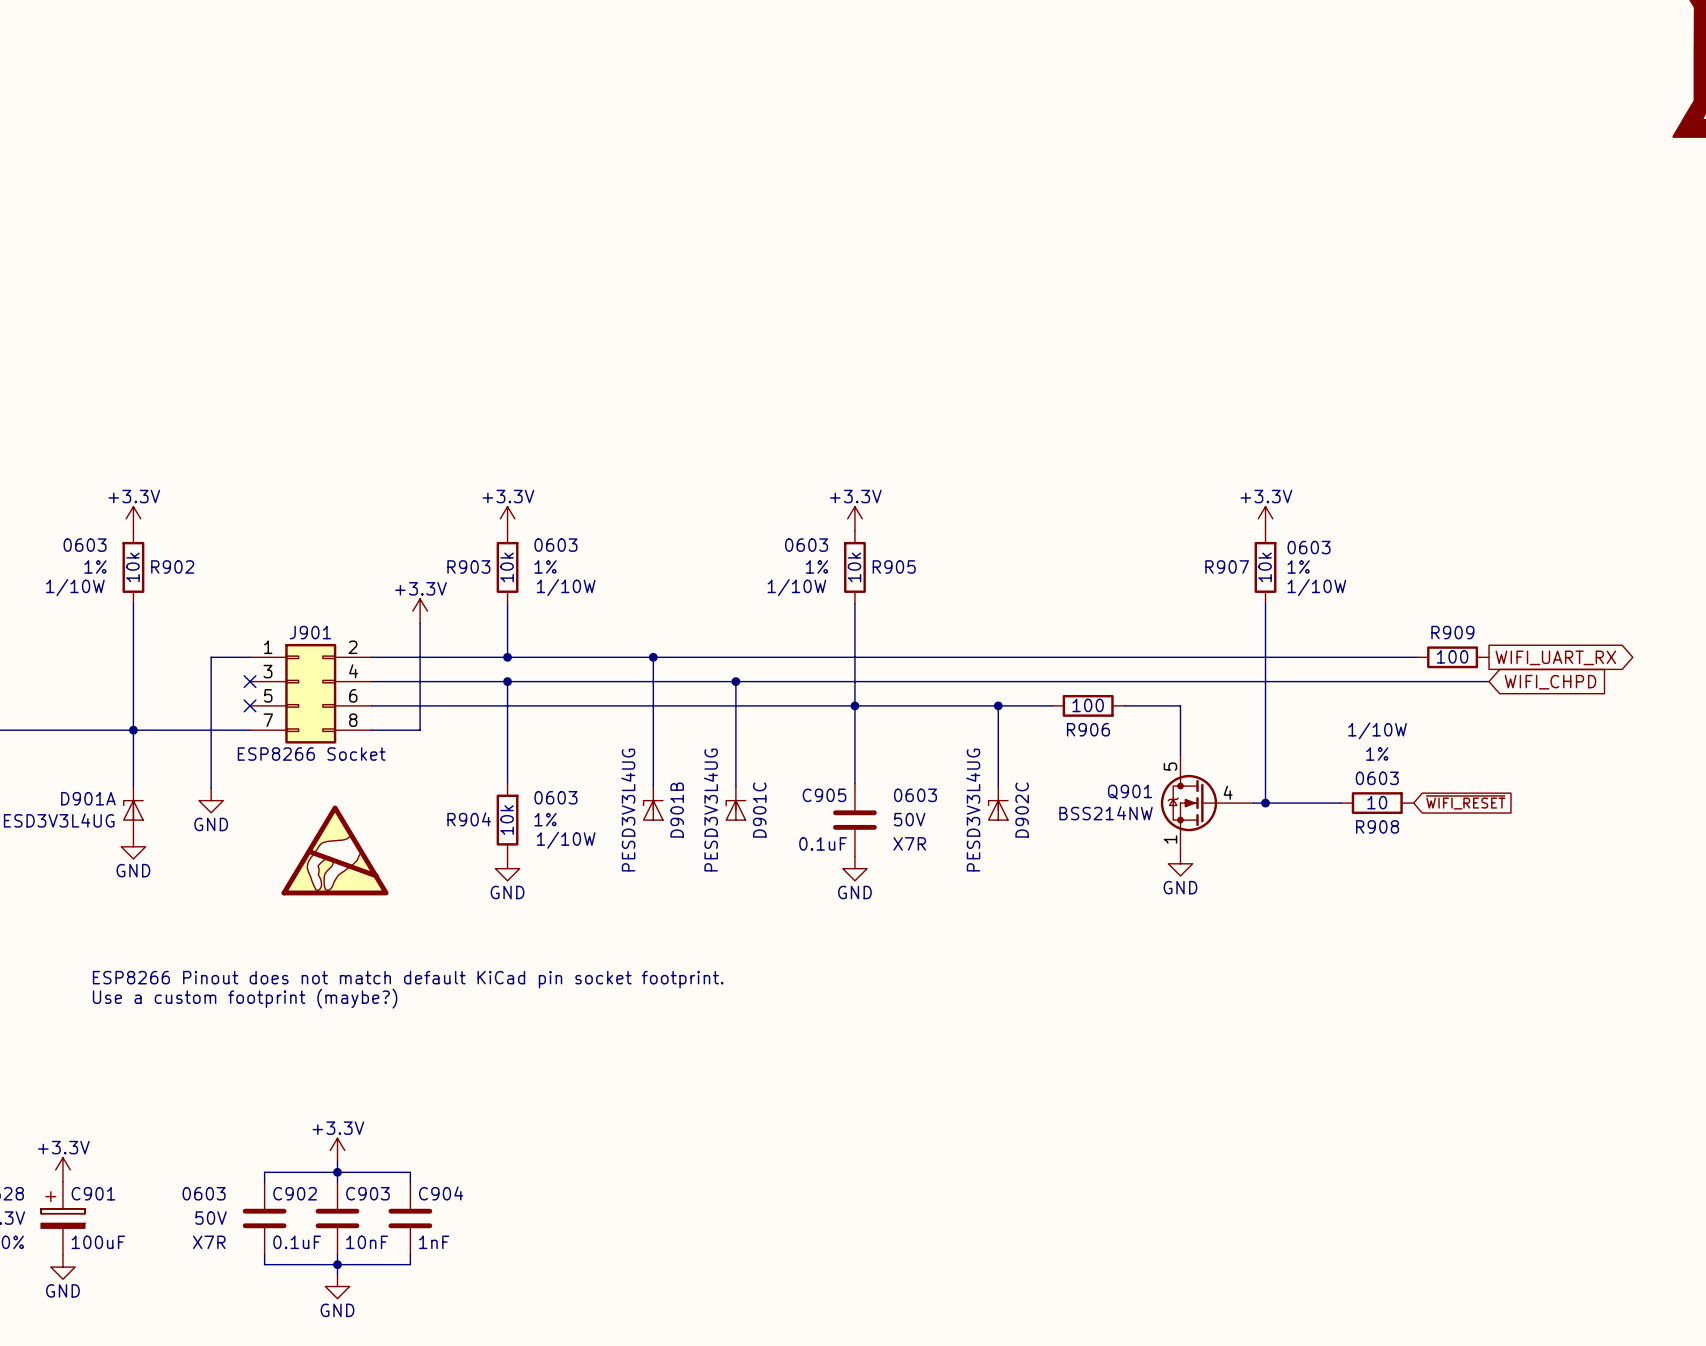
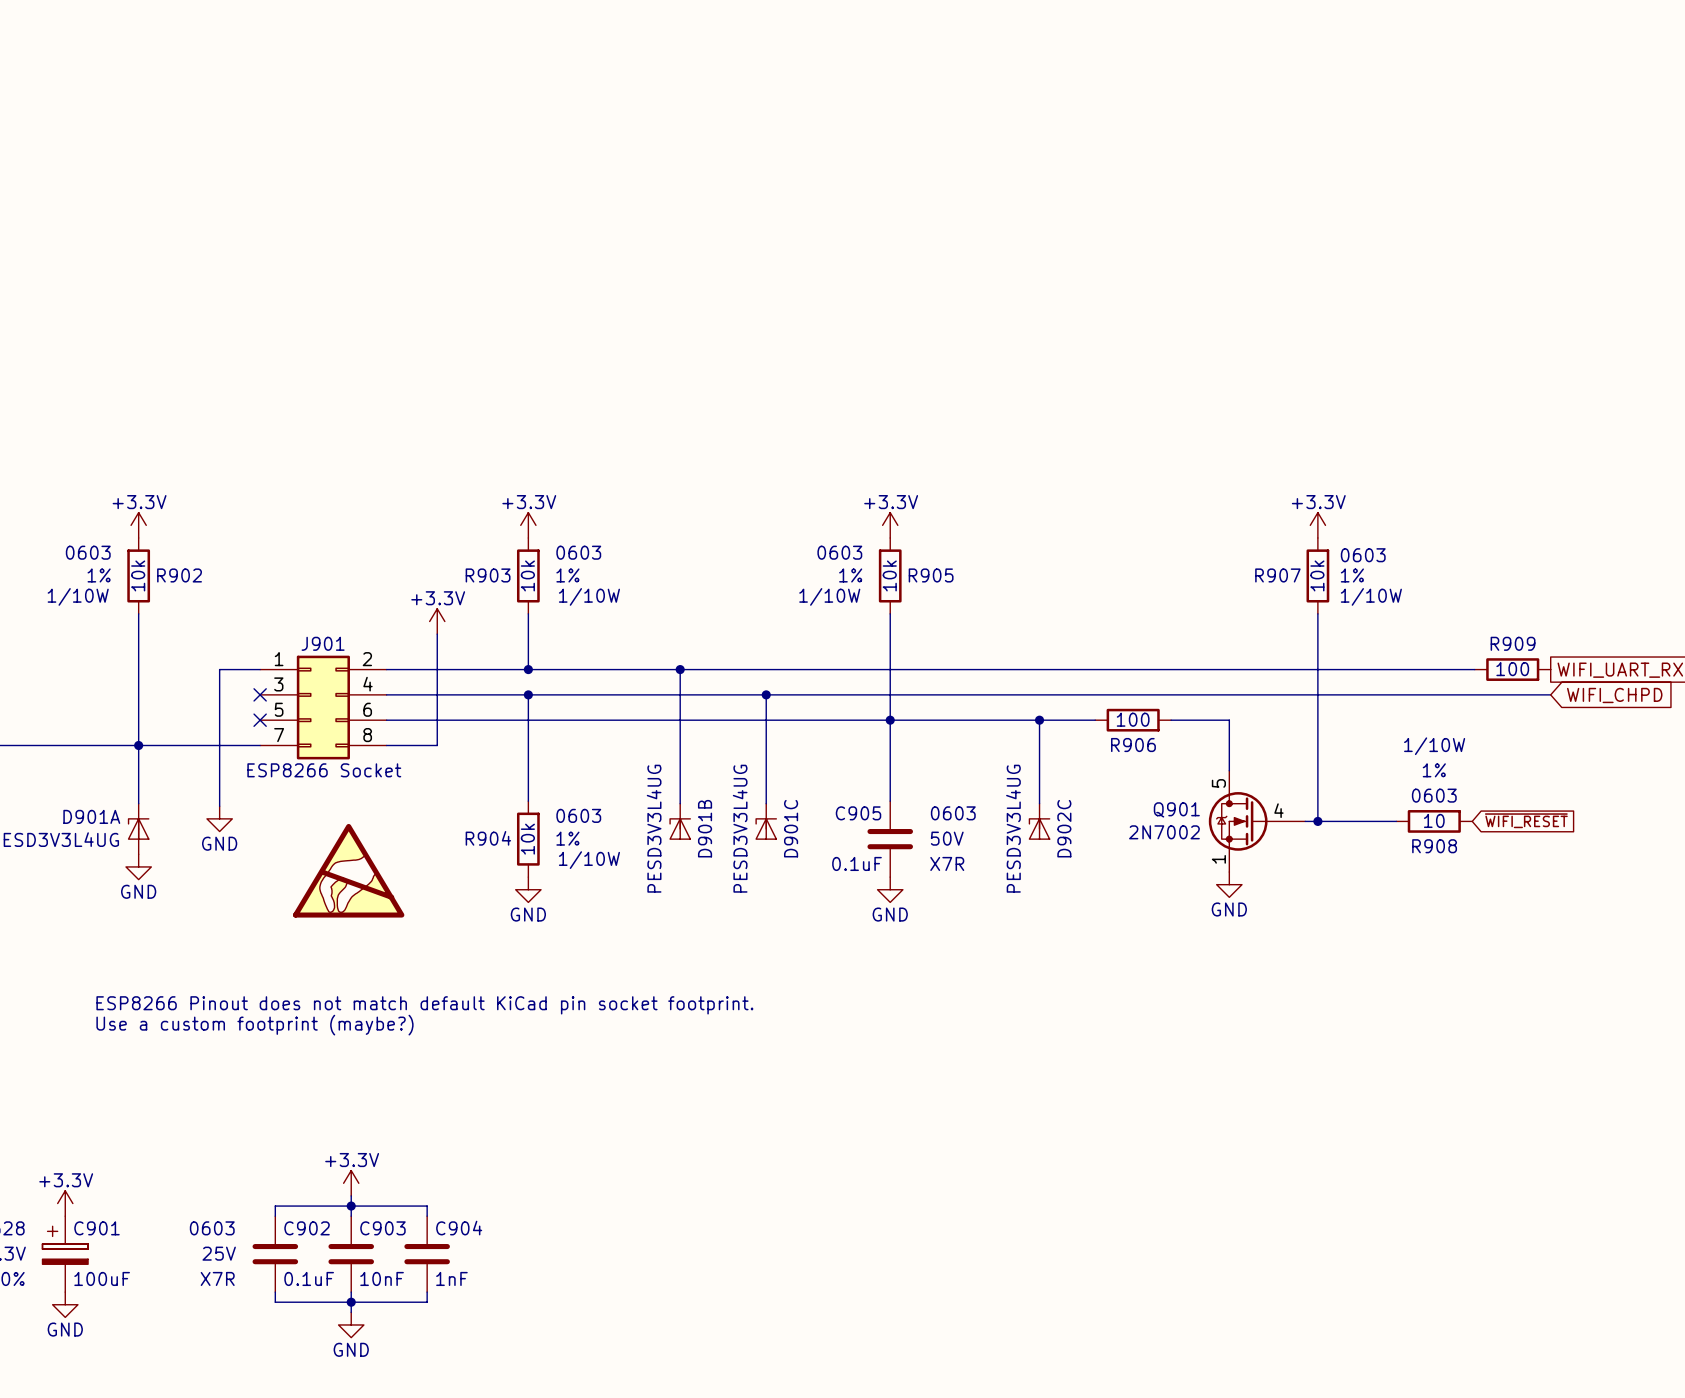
Q901 value: BSS214NW (1106, 813) -> 2N7002 (1164, 832)
C902 text: 50V (211, 1218) -> 25V (219, 1253)

